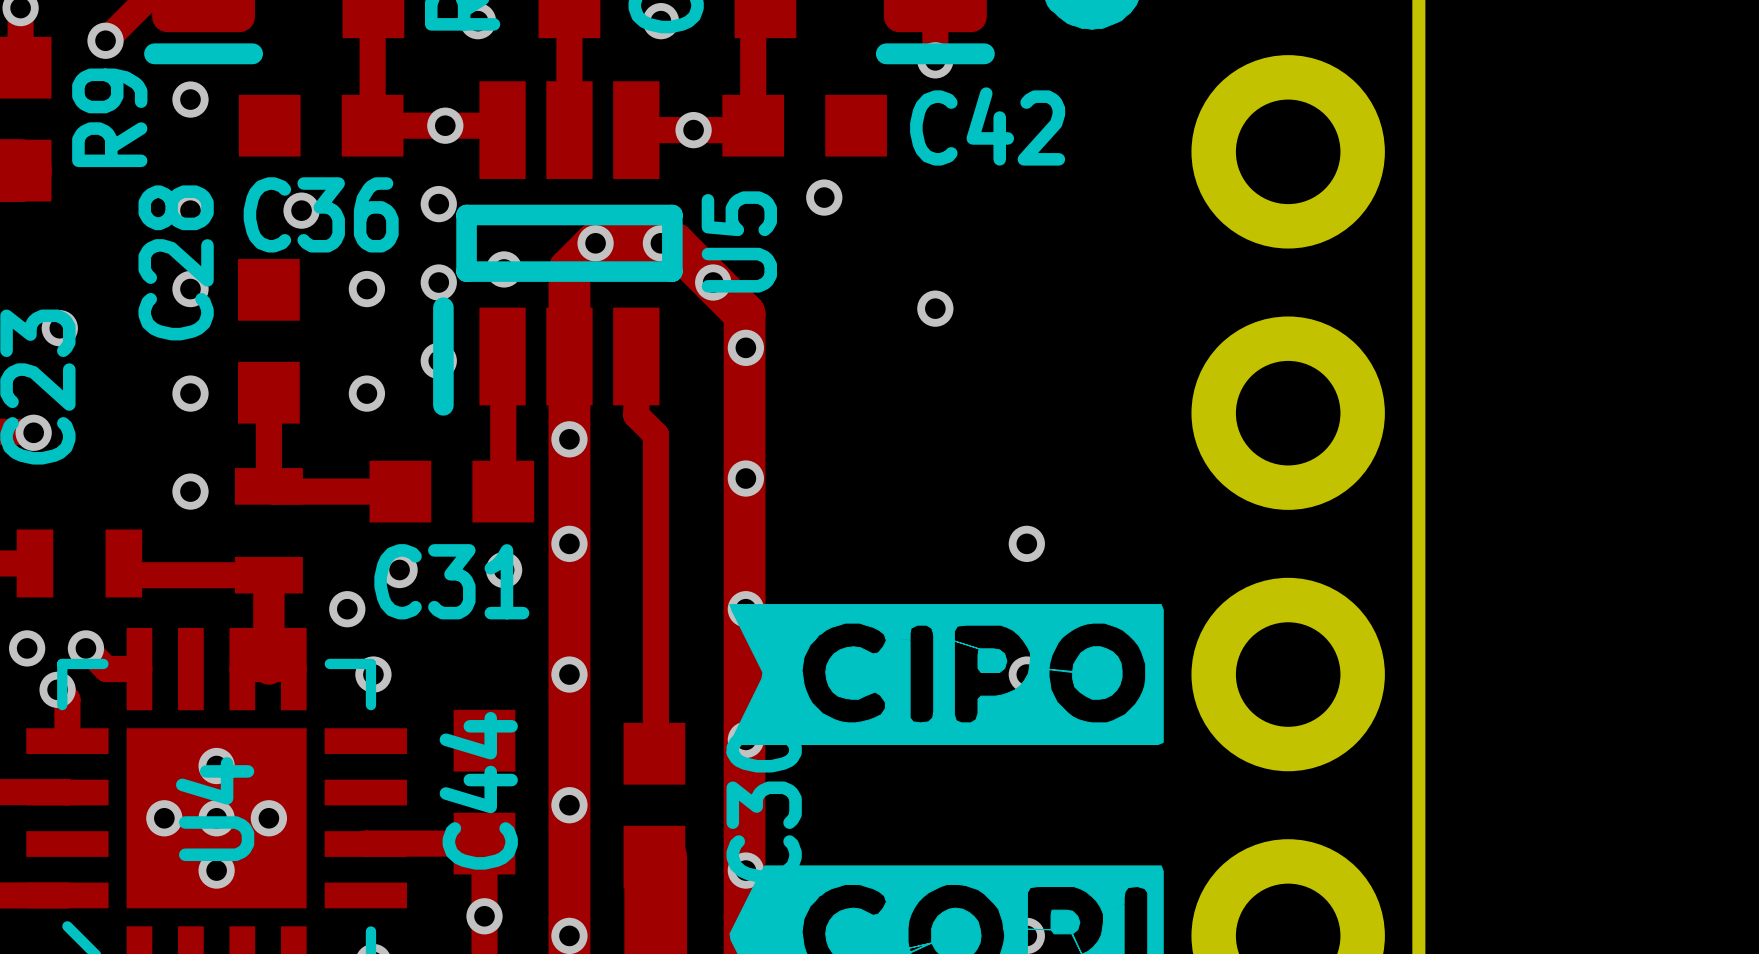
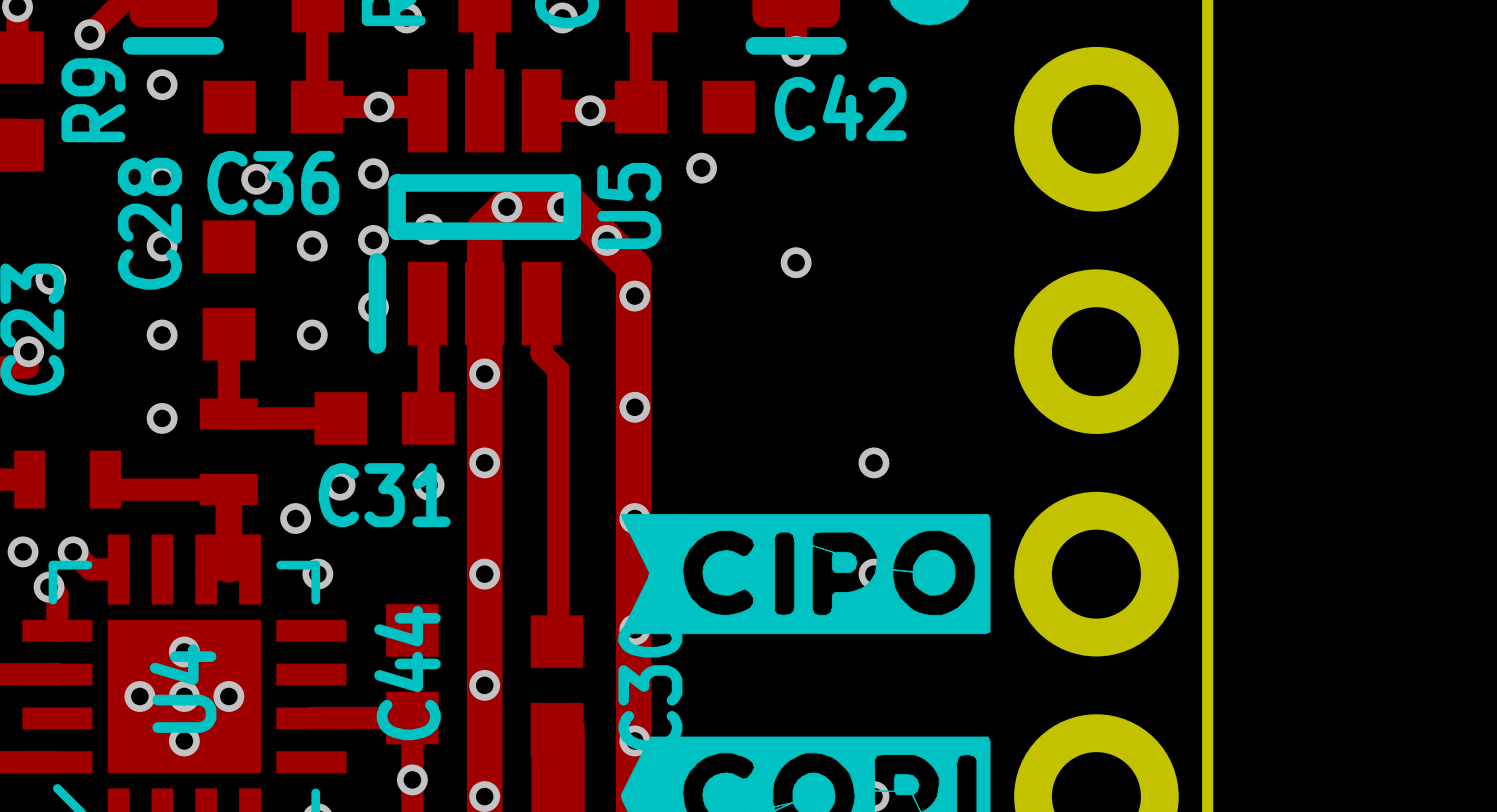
via position: (33, 432) -> (28, 351)

